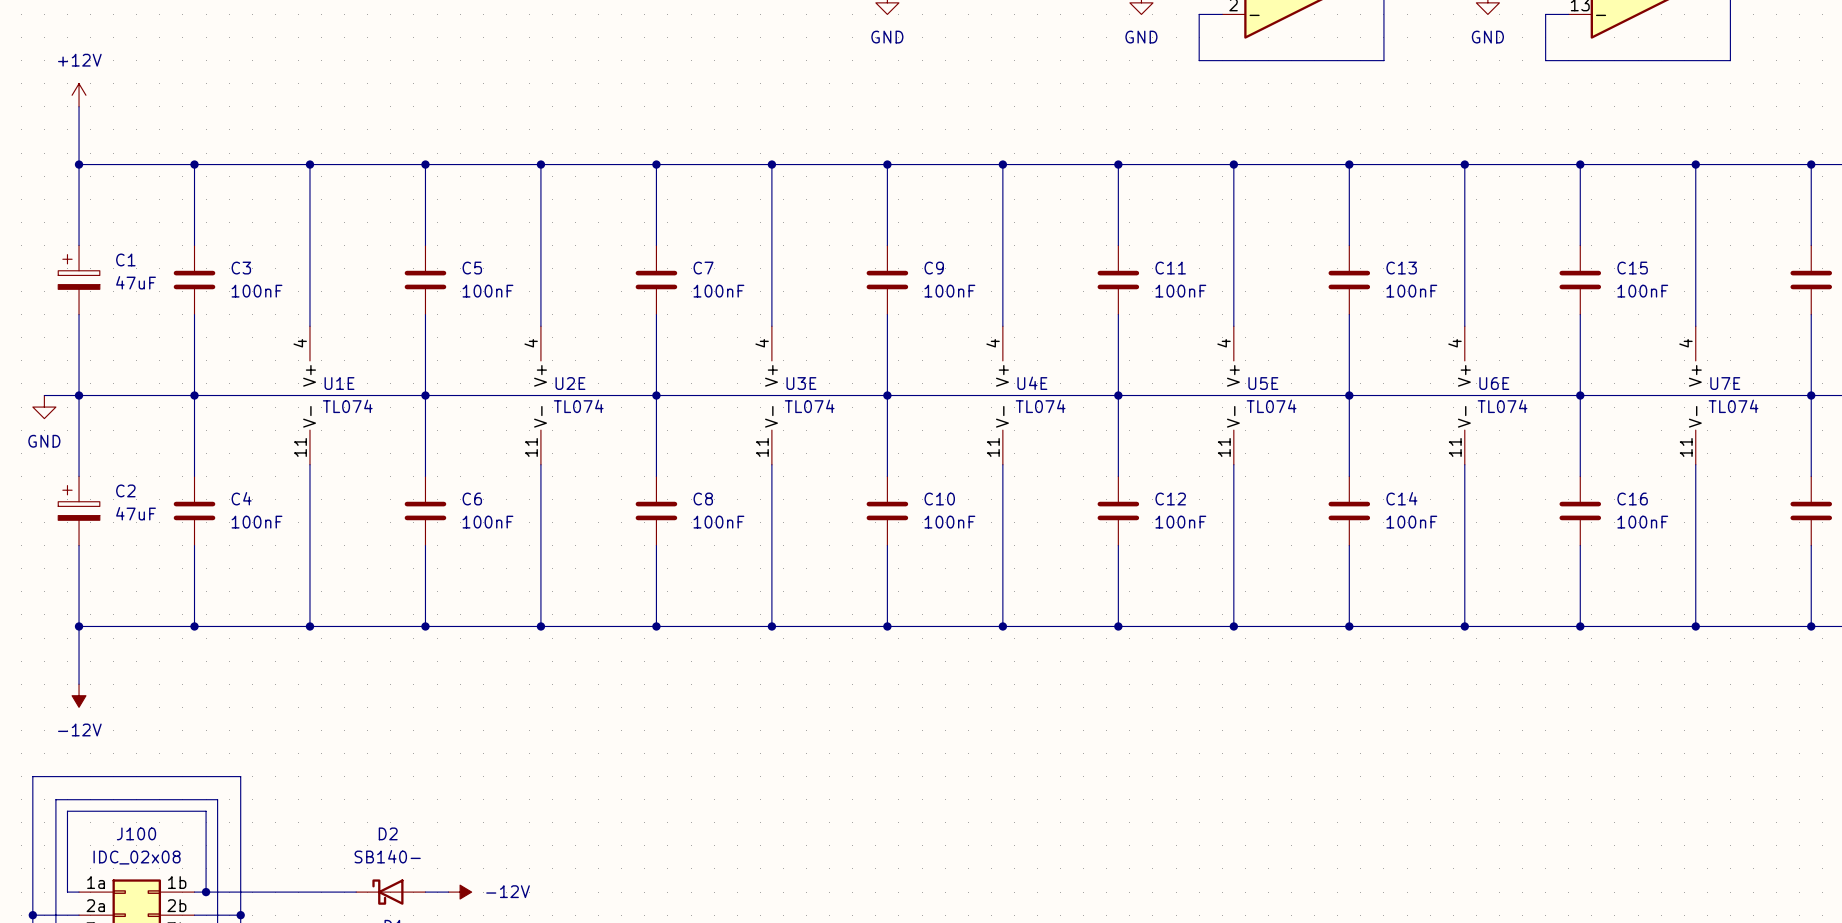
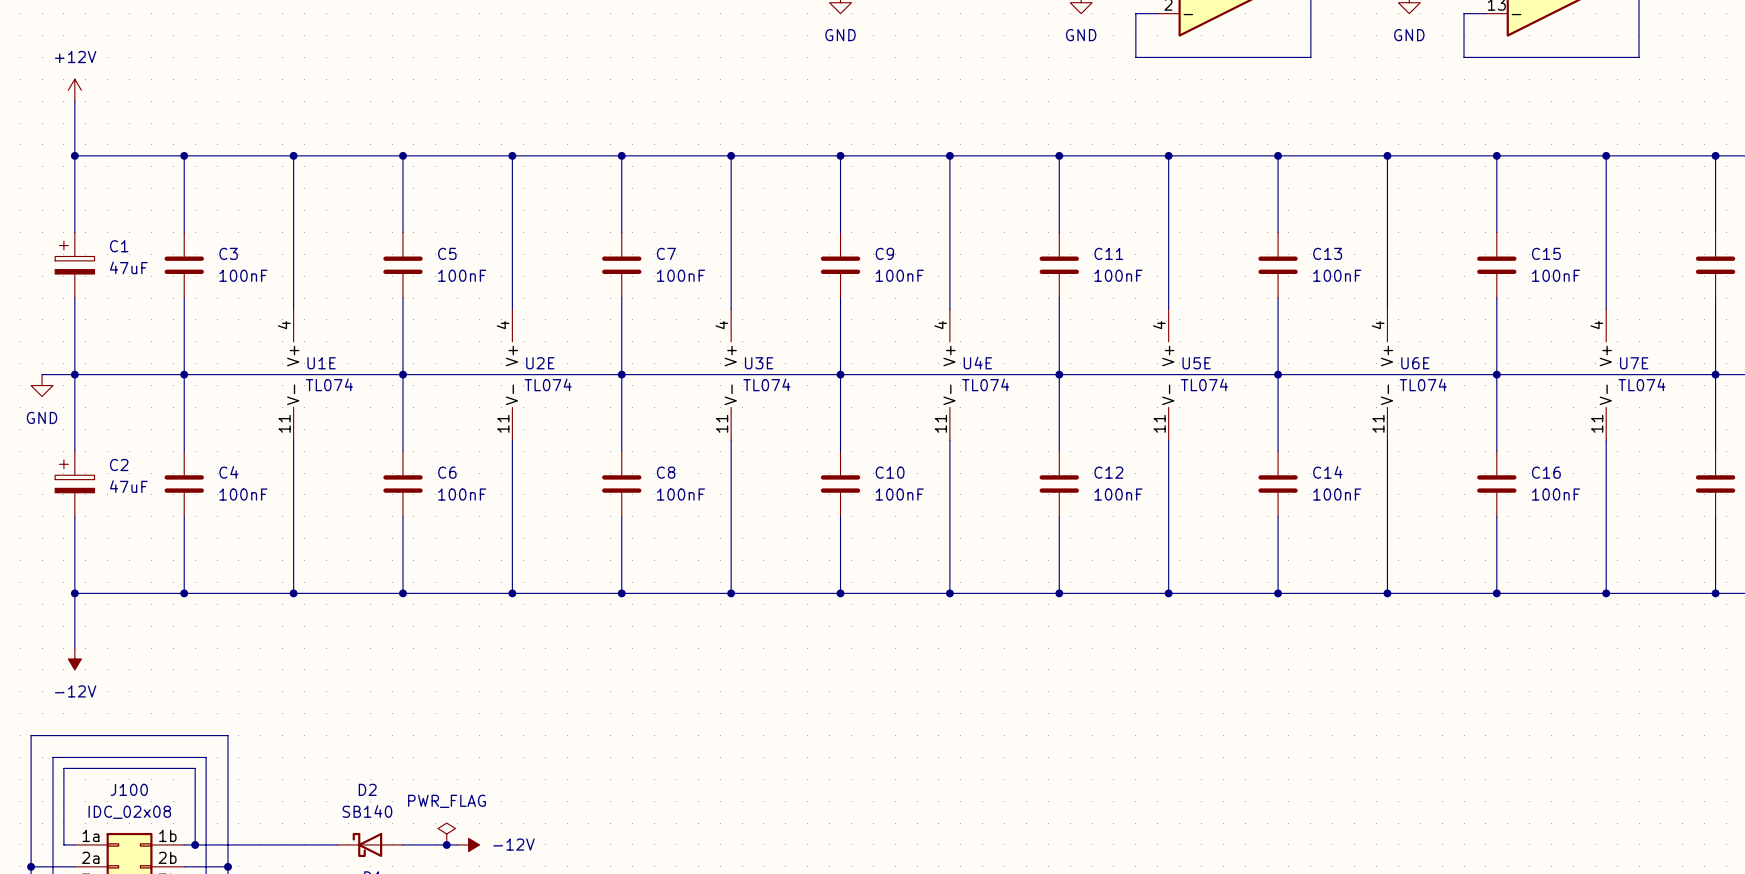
D2 value: SB140- (387, 856) -> SB140 (367, 811)
power symbol: none -> PWR_FLAG (446, 834)
power symbol position: -12V (460, 892) -> -12V (468, 844)
junction: none -> (446, 844)

